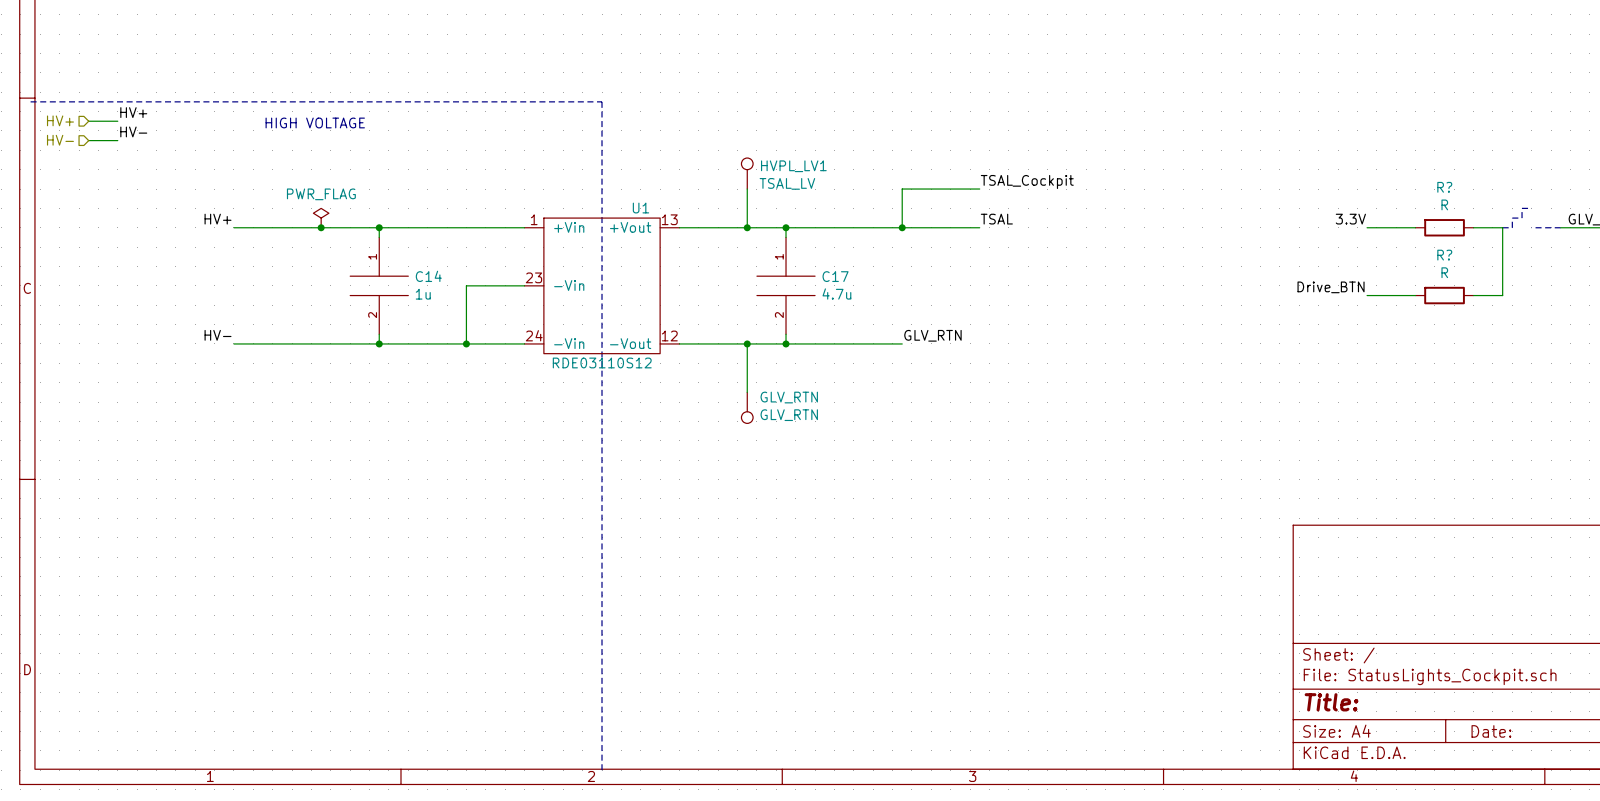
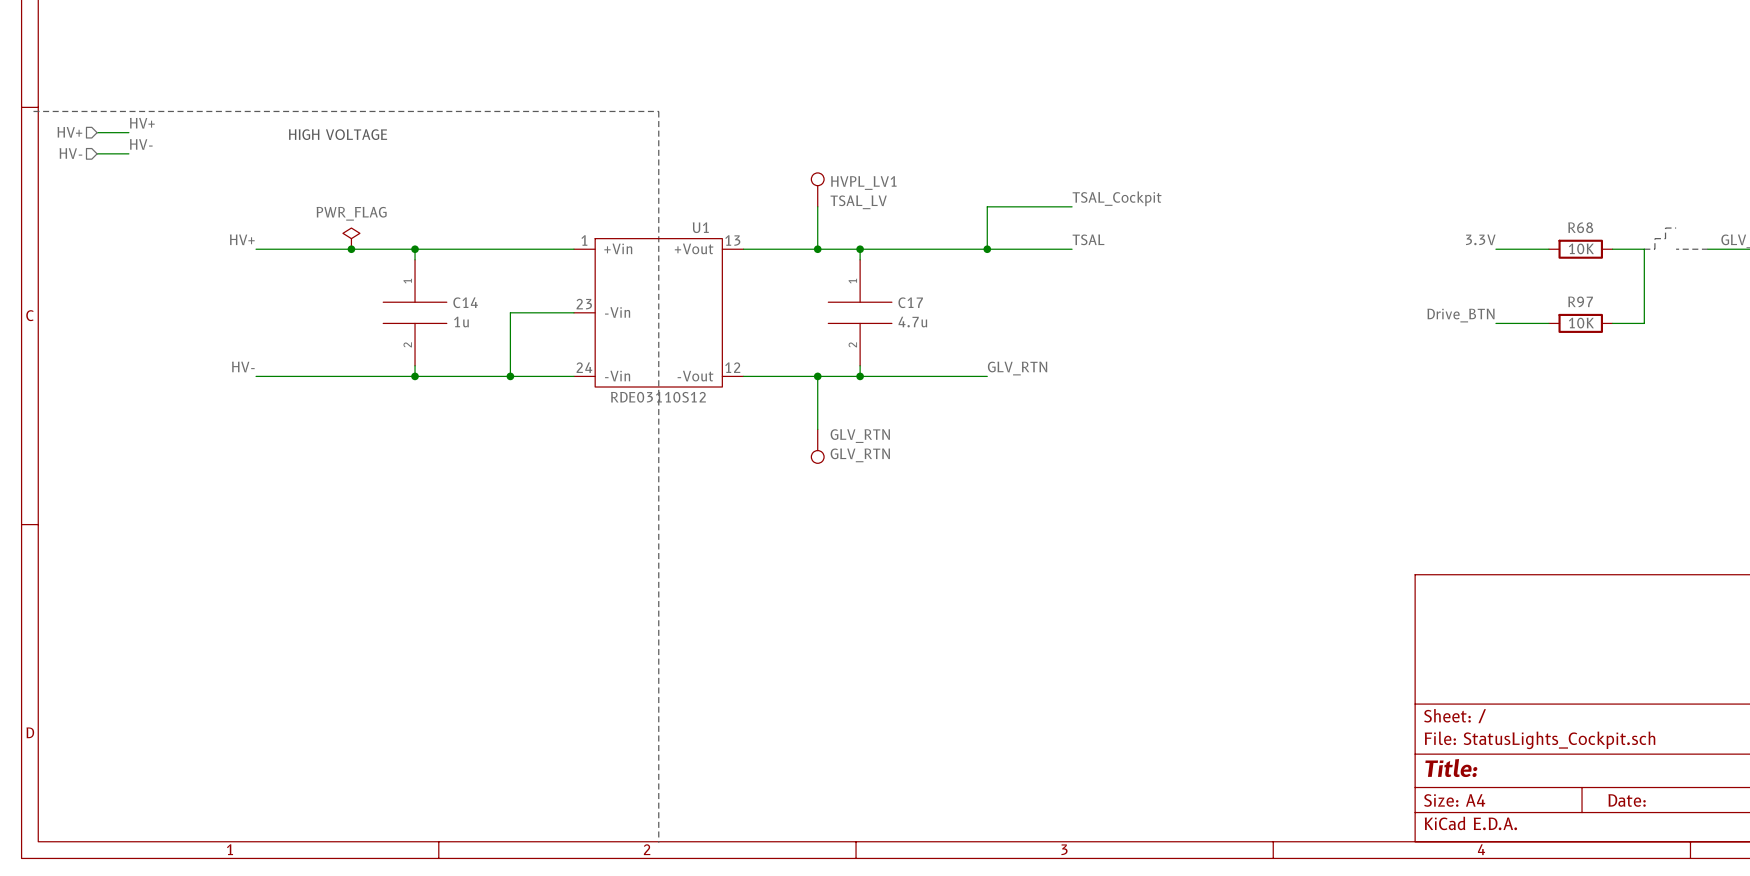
R? name: R? (1444, 187) -> R68 (1580, 227)
R? value: R (1444, 204) -> 10K (1581, 248)
R? name: R? (1444, 255) -> R97 (1580, 301)
R? value: R (1444, 272) -> 10K (1581, 323)

